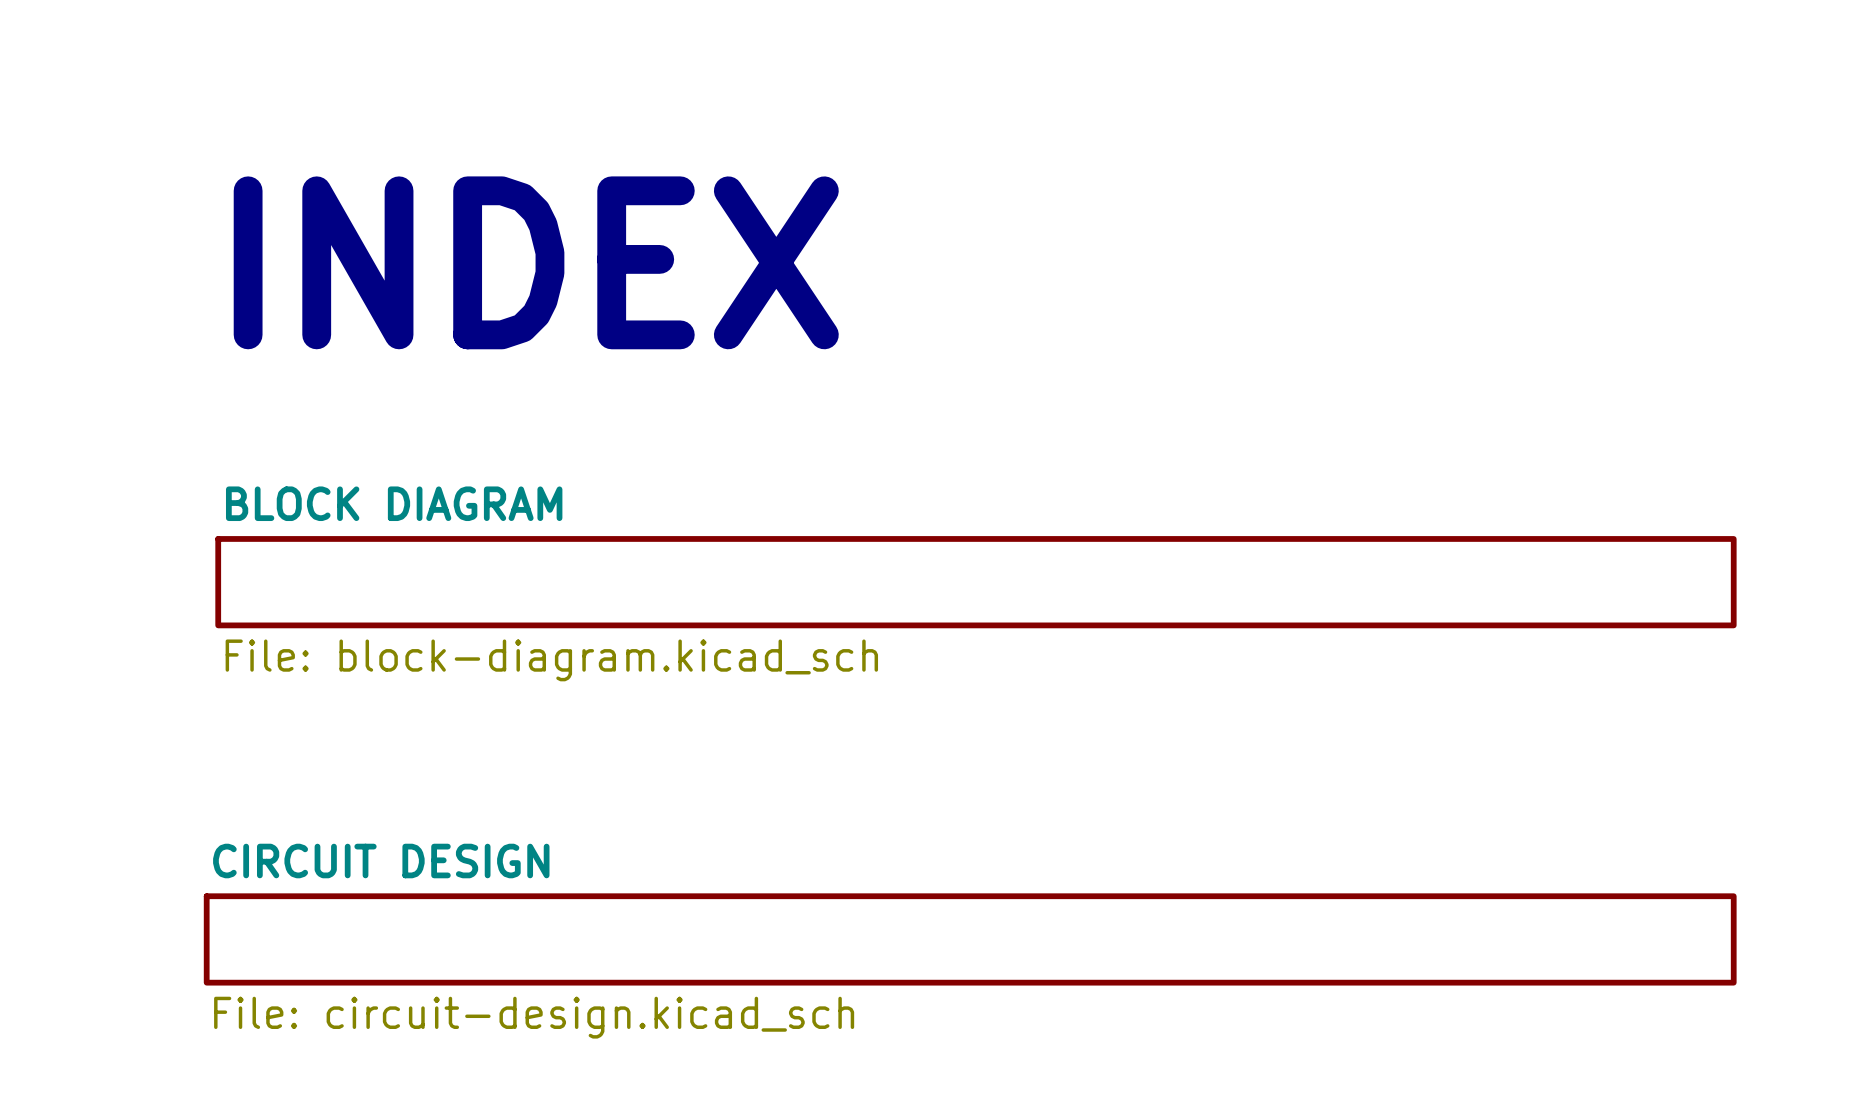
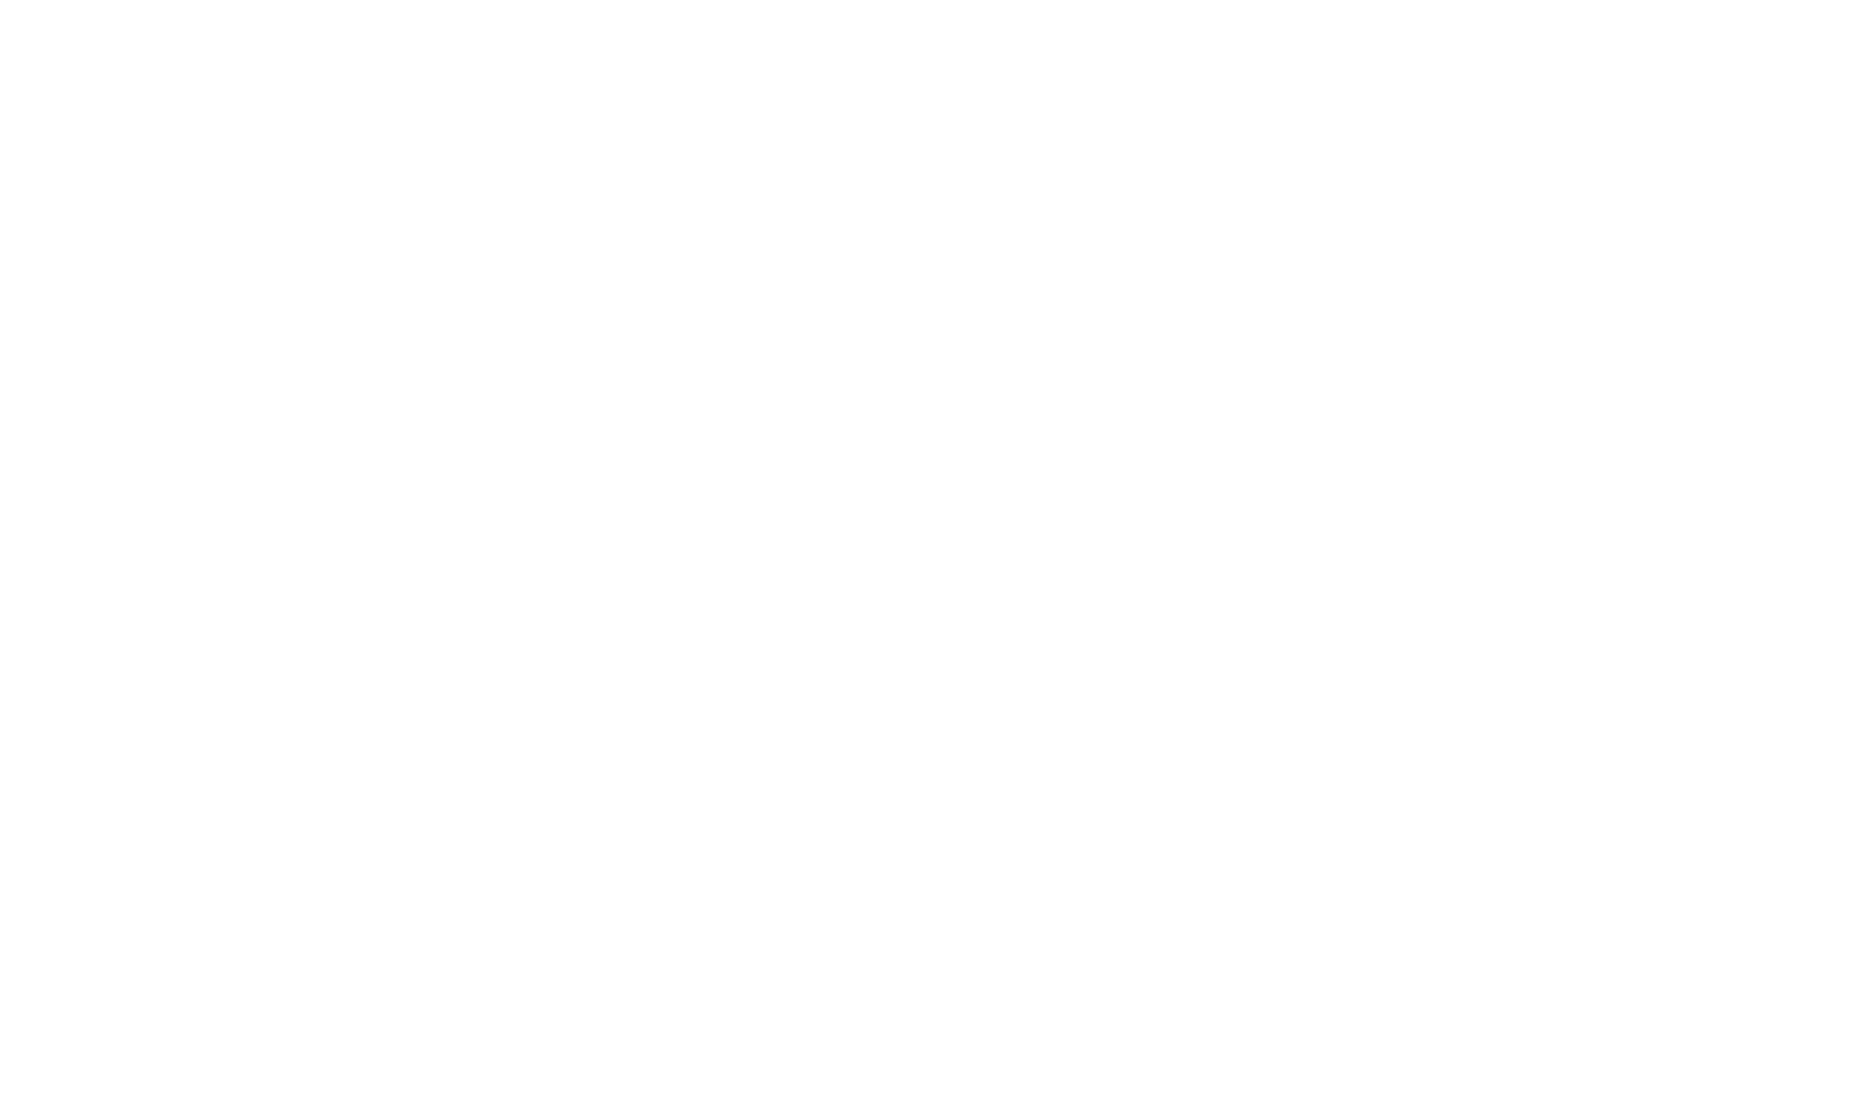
text: INDEX (536, 262) -> none
sheet BLOCK DIAGRAM: File: block-diagram.kicad_sch (975, 582) -> none
sheet CIRCUIT DESIGN: File: circuit-design.kicad_sch (970, 939) -> none

